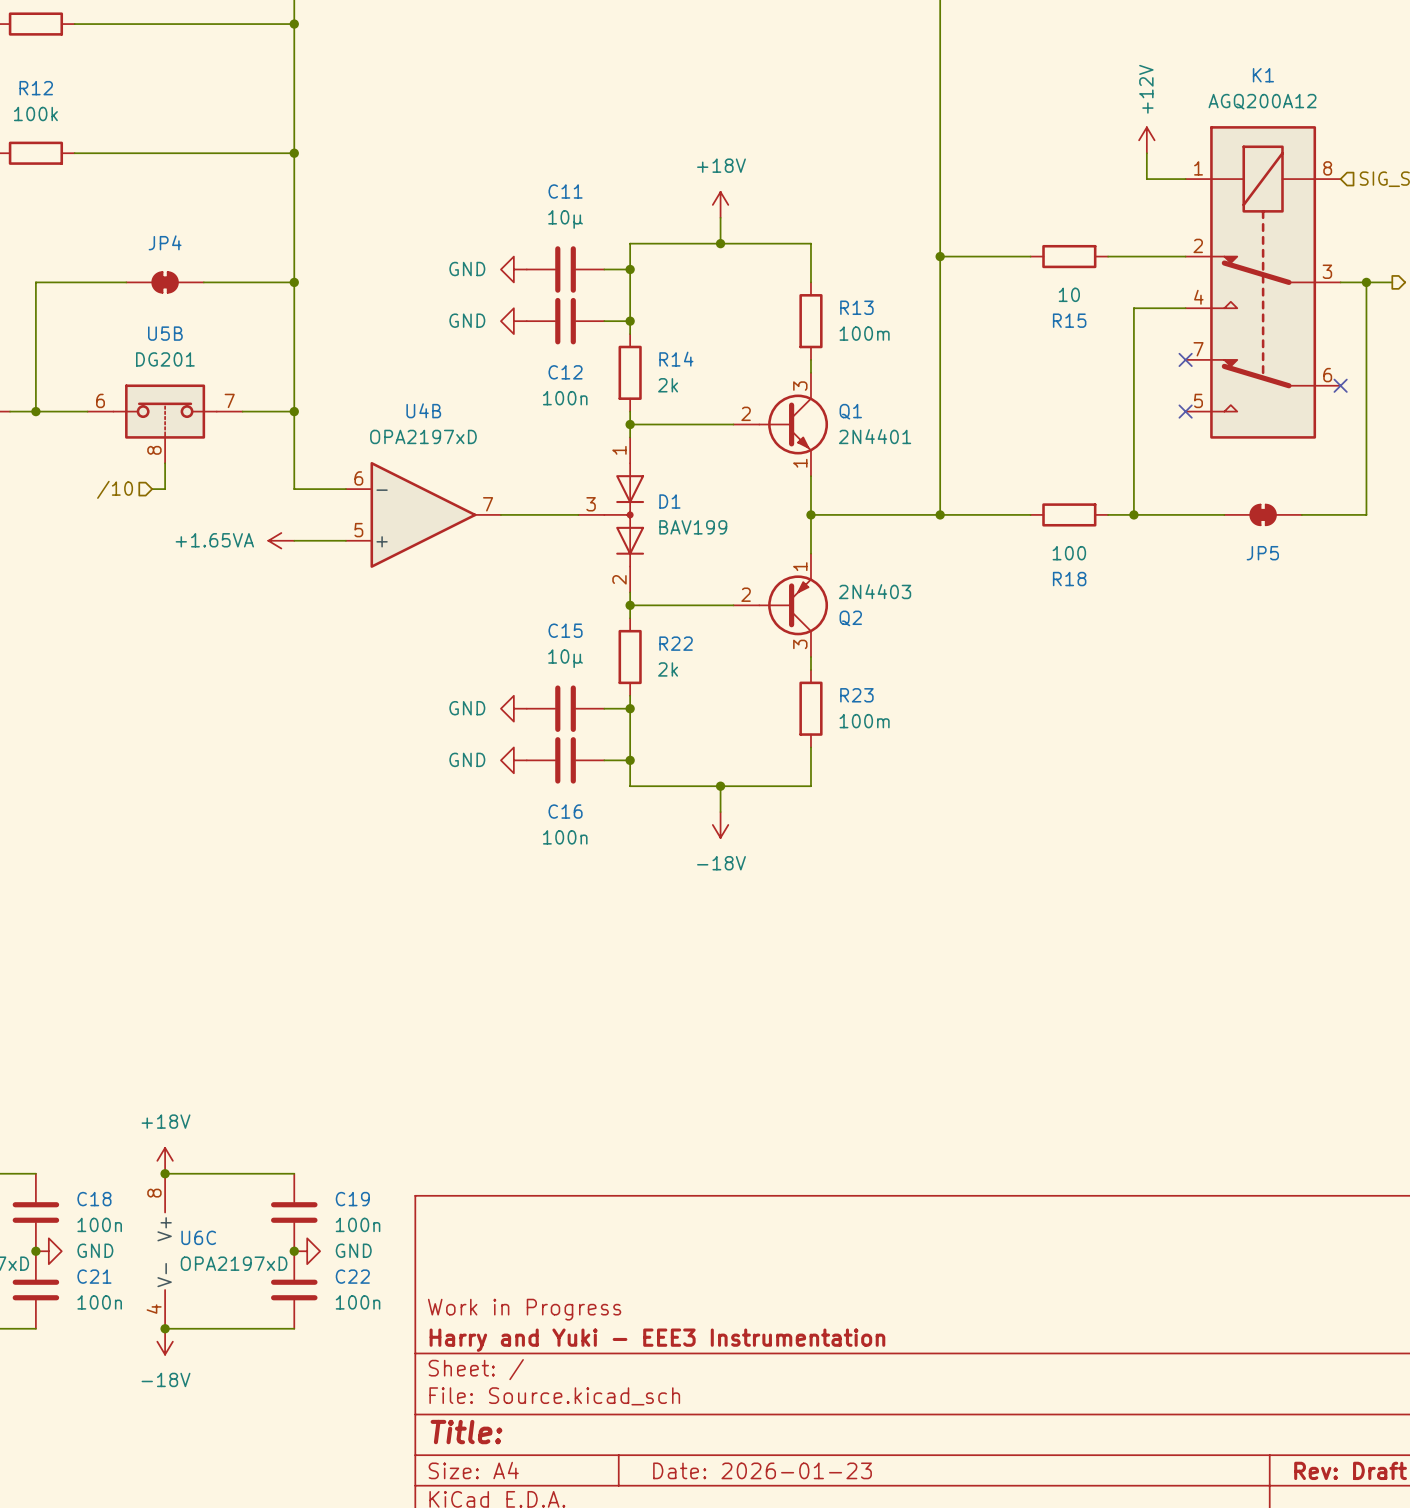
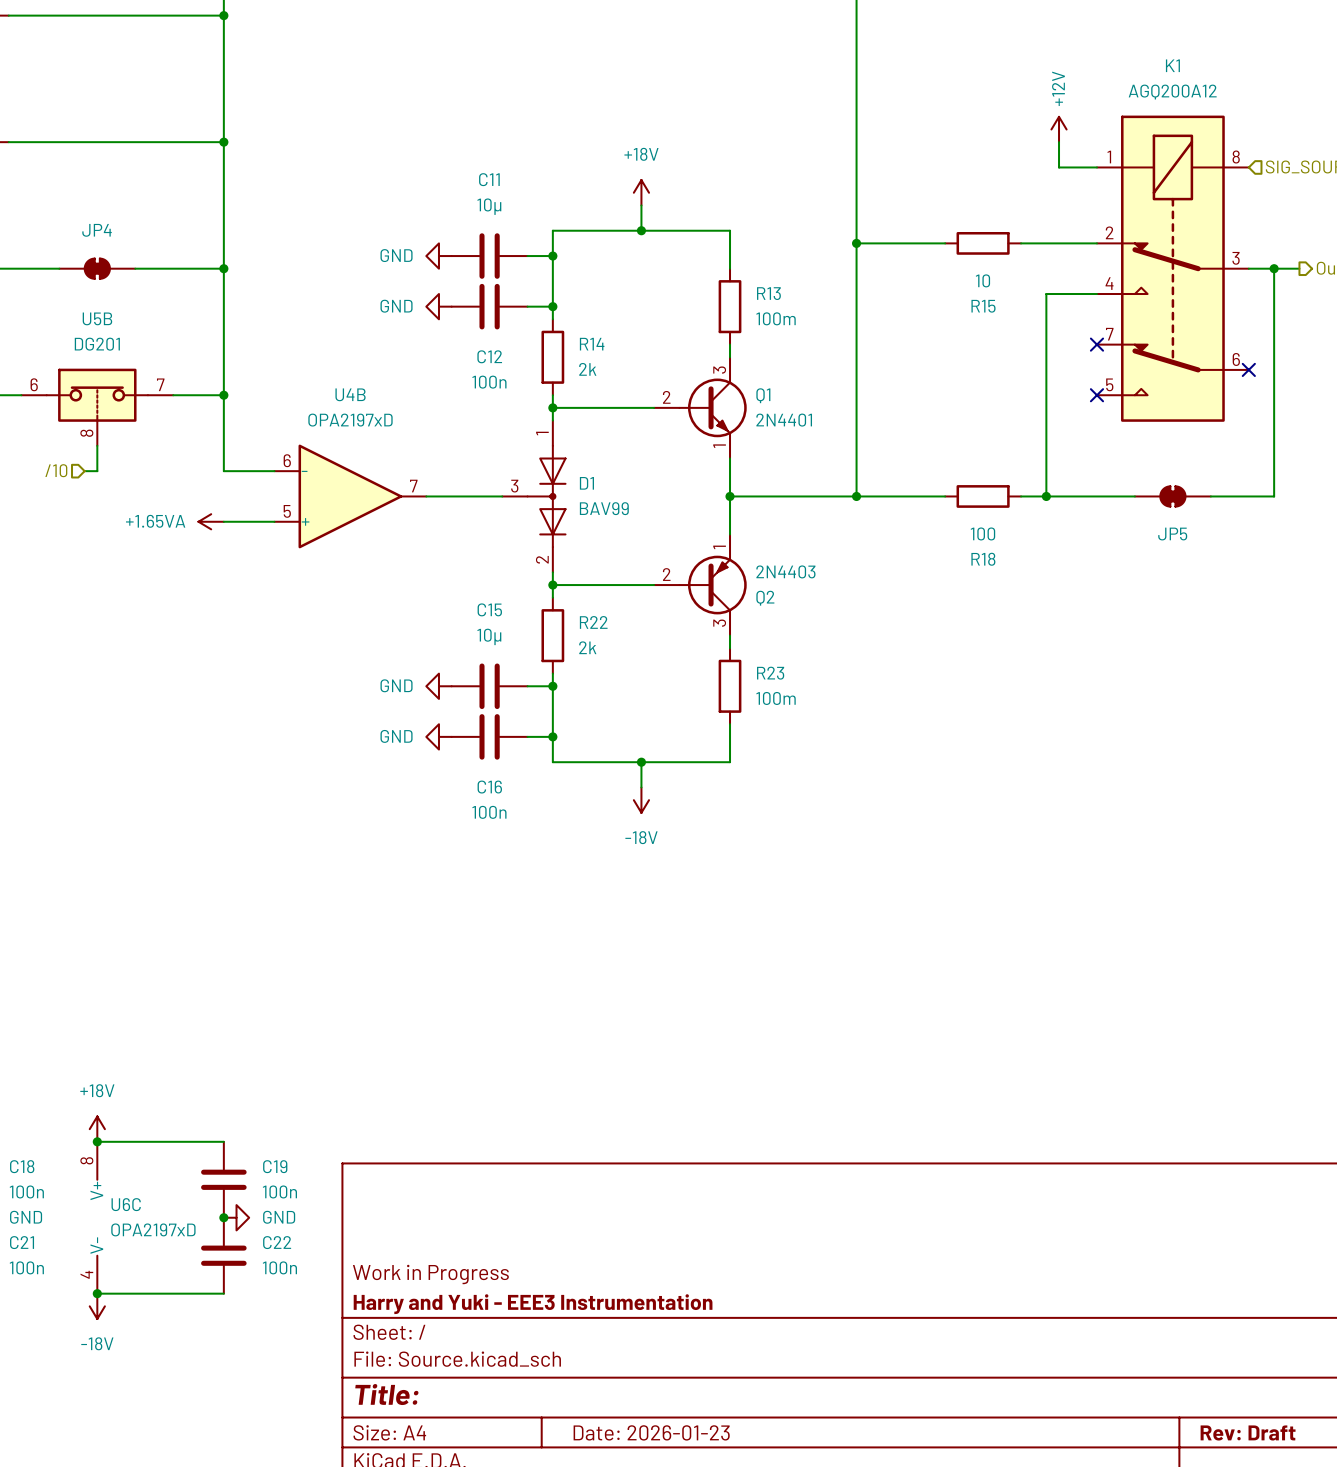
D1 value: BAV199 (693, 527) -> BAV99 (604, 508)

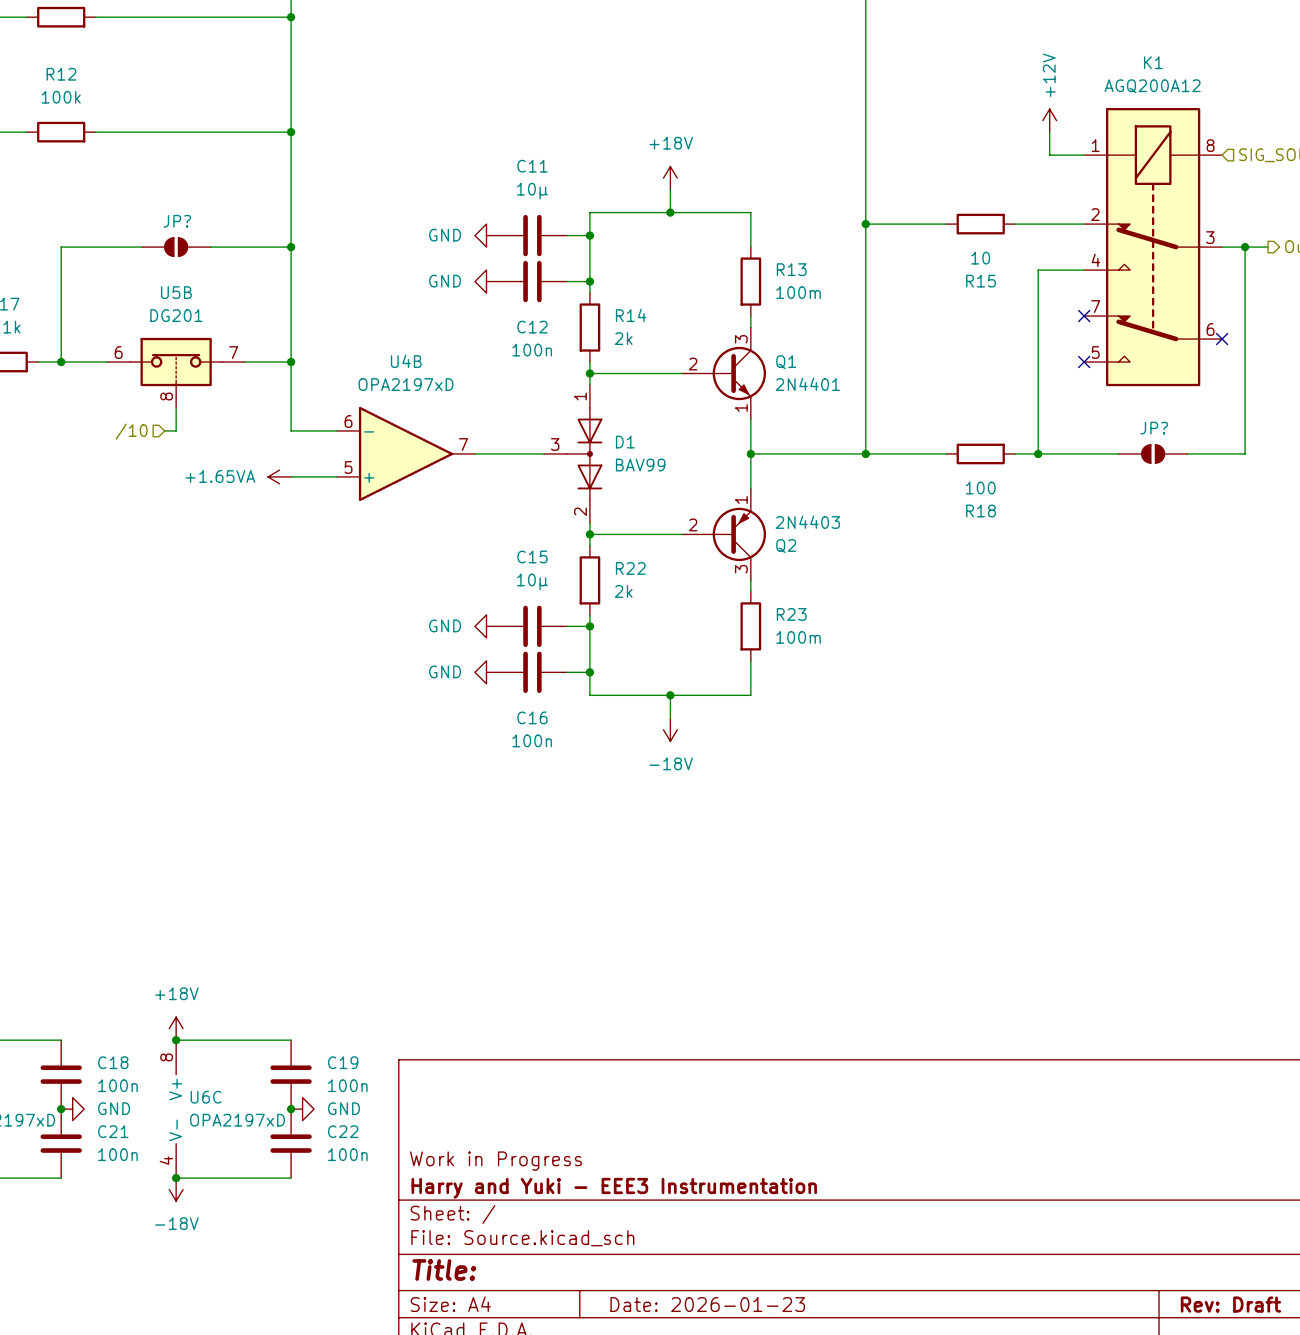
JP4: (97, 268) -> none
JP?: none -> (176, 247)
JP5: (1172, 496) -> none
JP?: none -> (1153, 453)

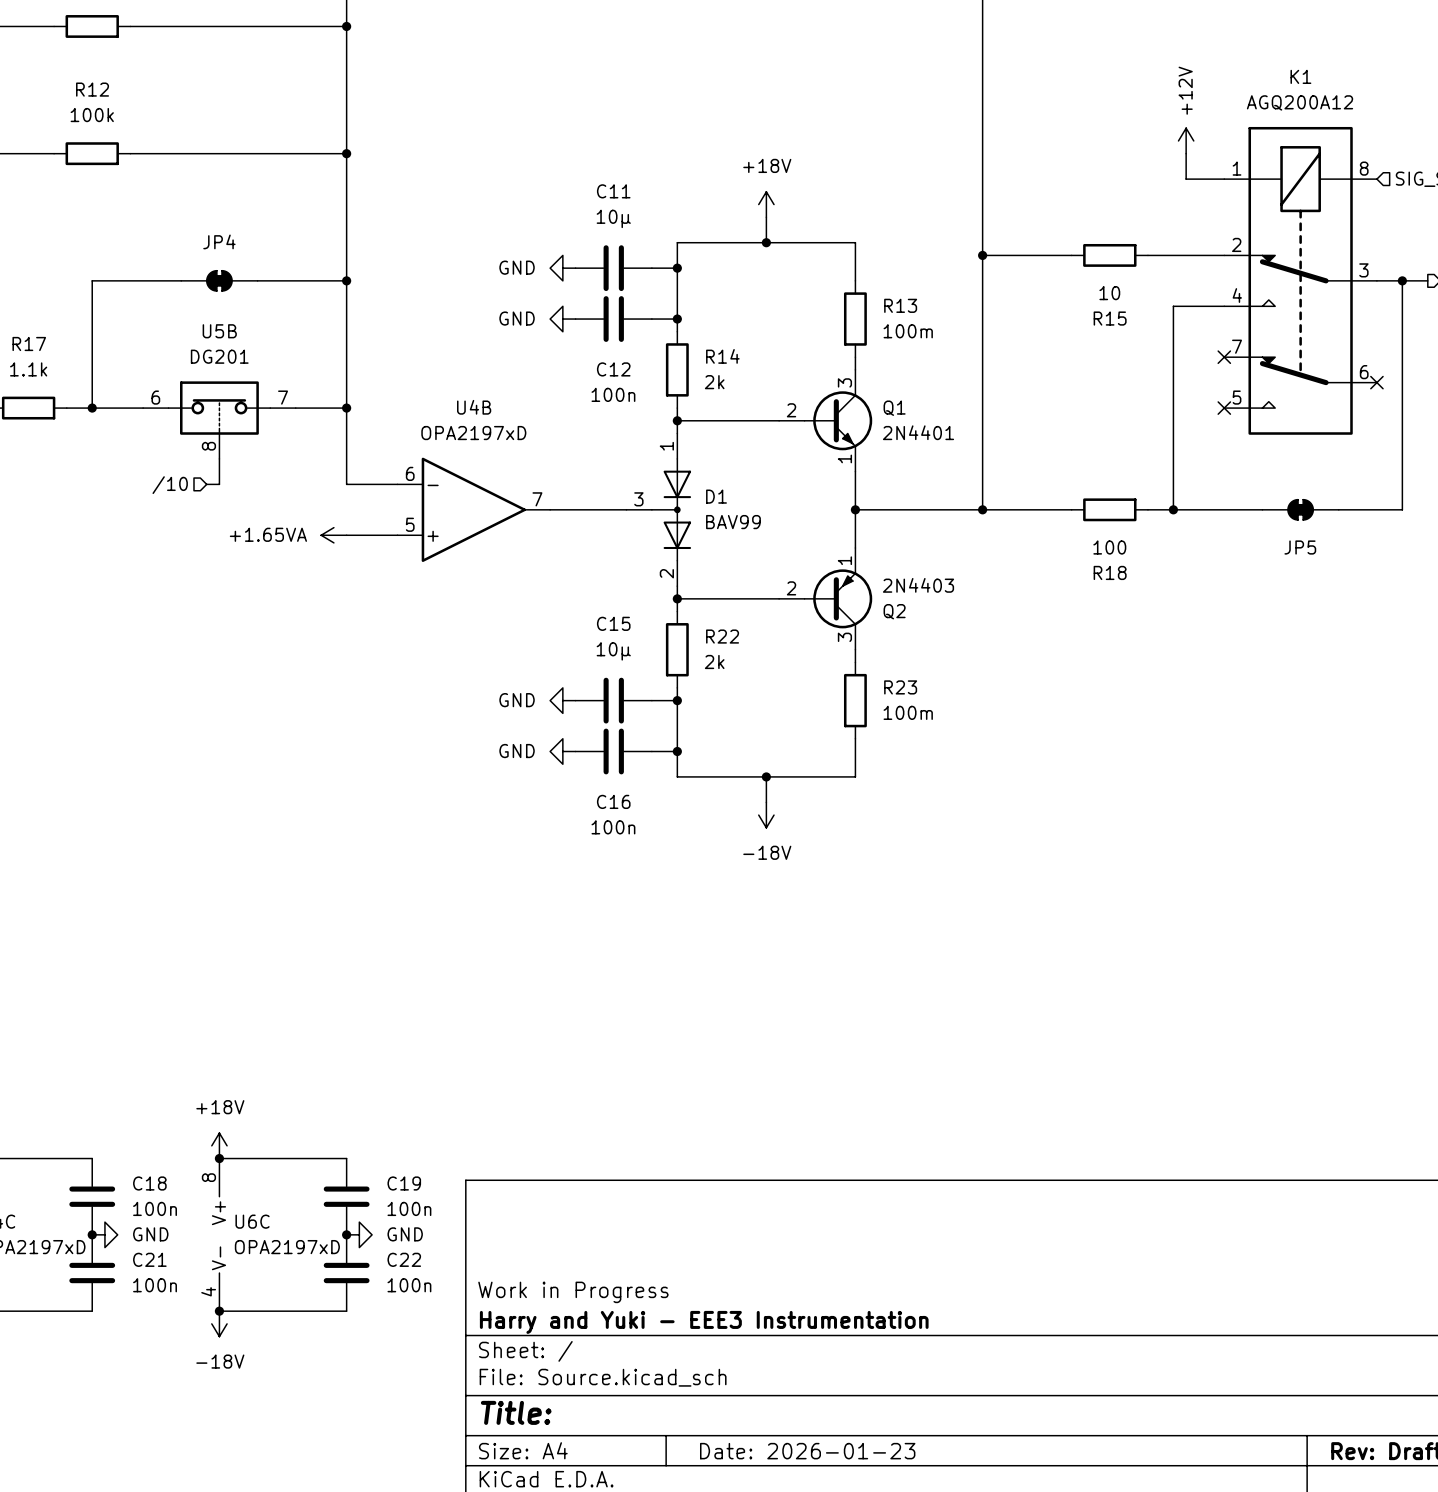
JP?: (176, 247) -> none
JP4: none -> (219, 280)
JP?: (1153, 453) -> none
JP5: none -> (1300, 509)

